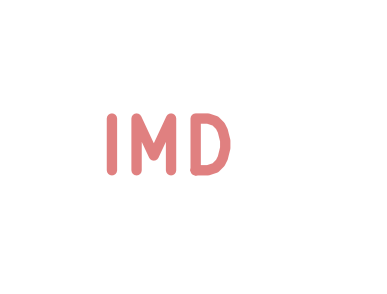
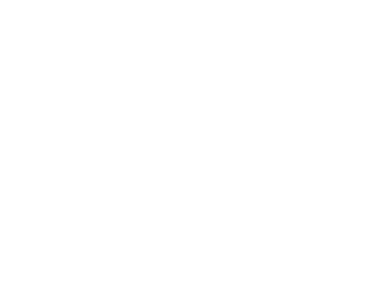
text: IMD (168, 144) -> none

